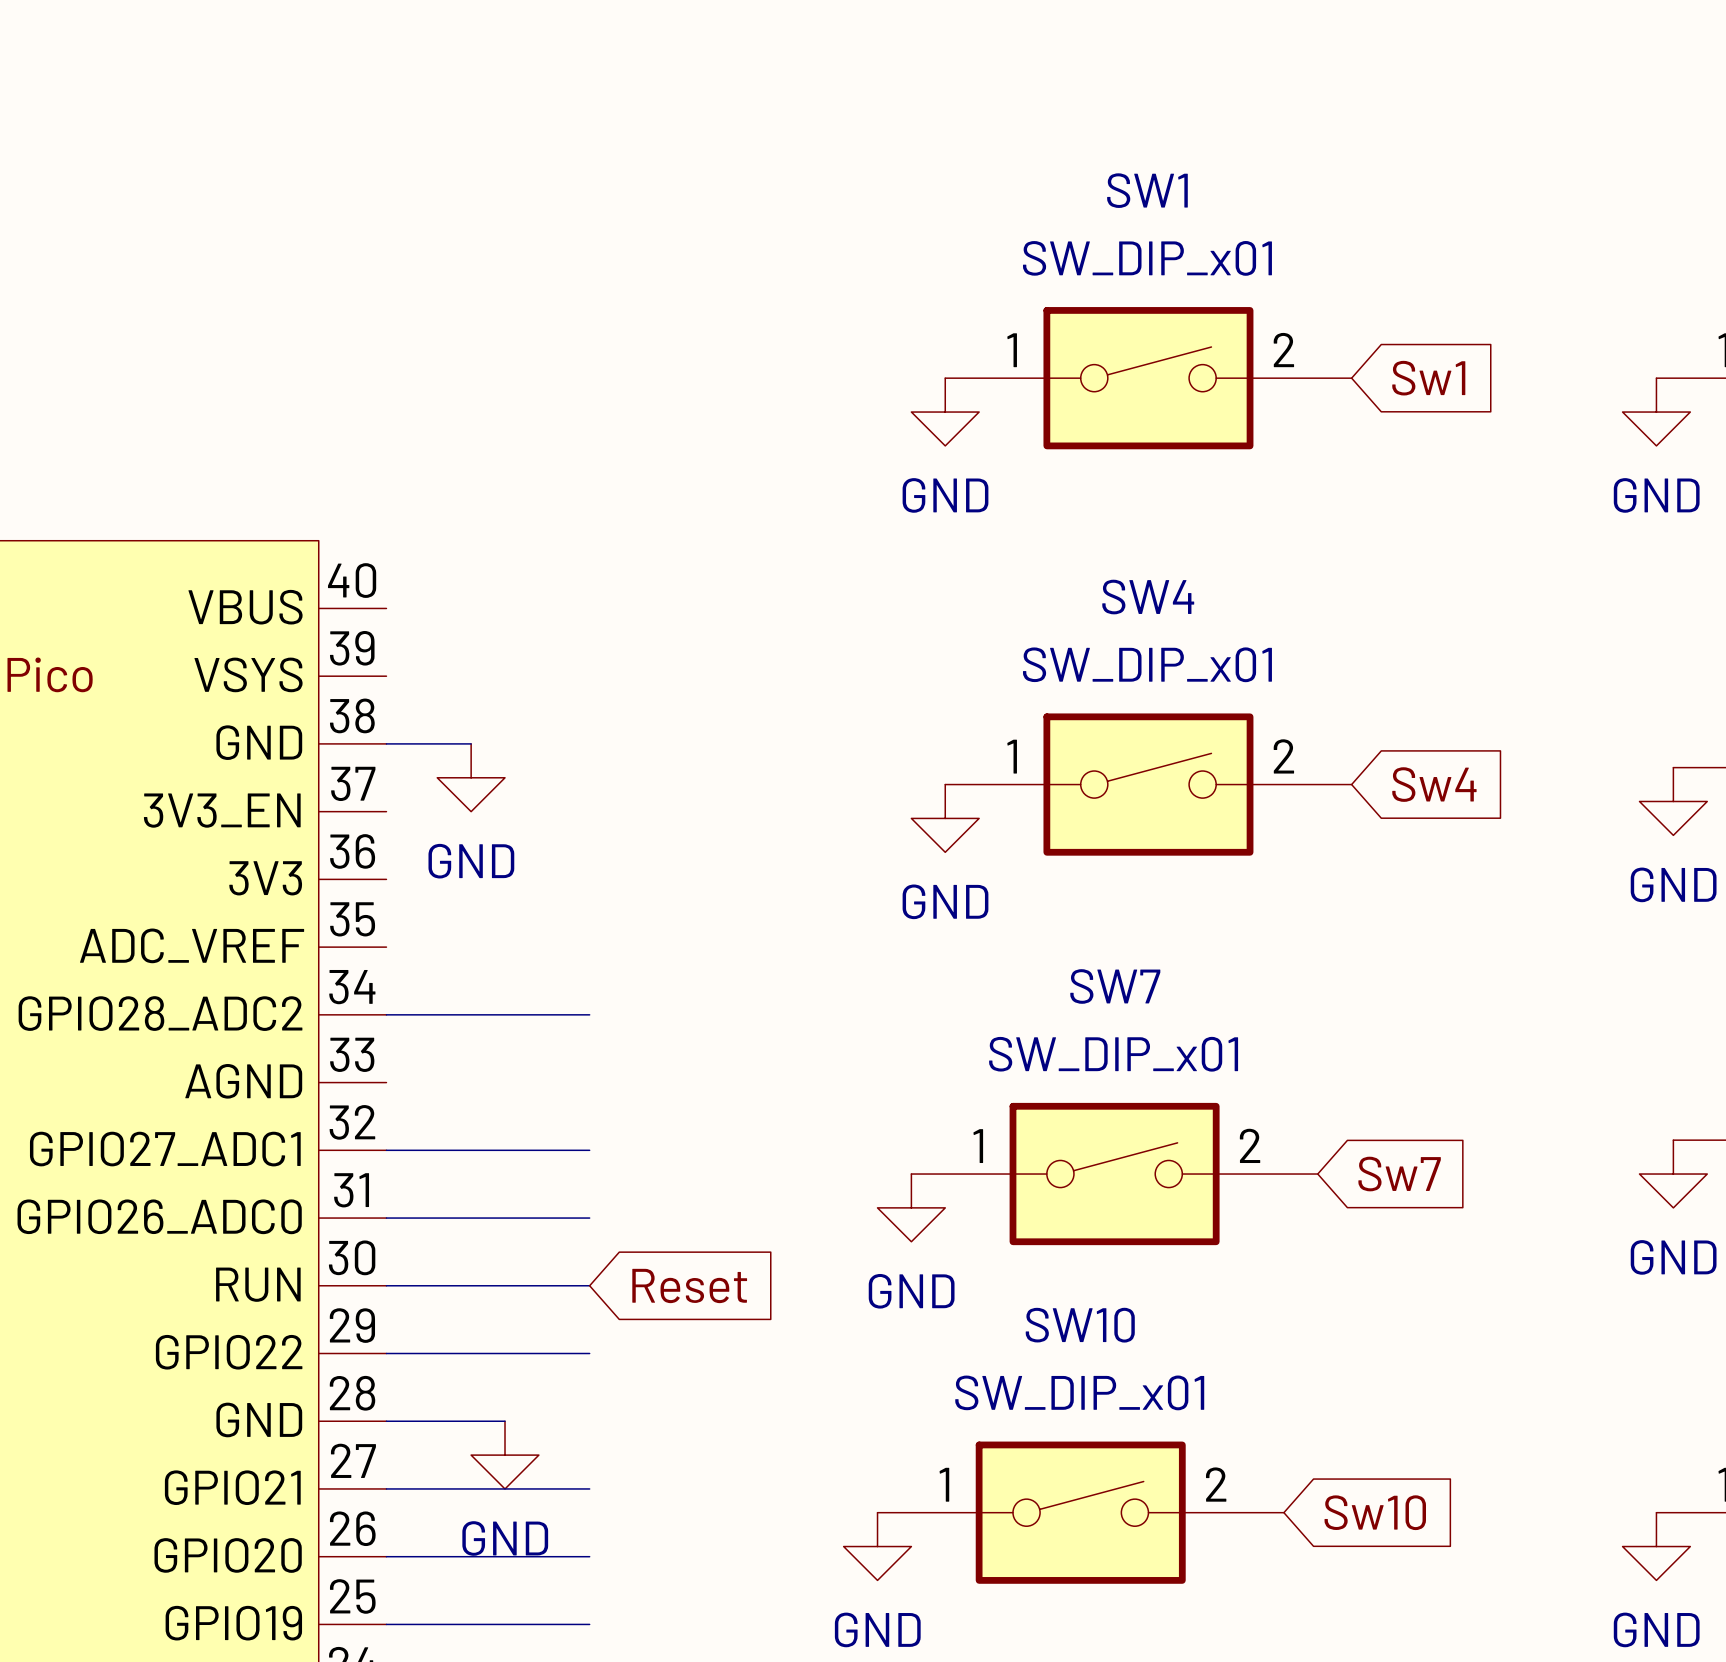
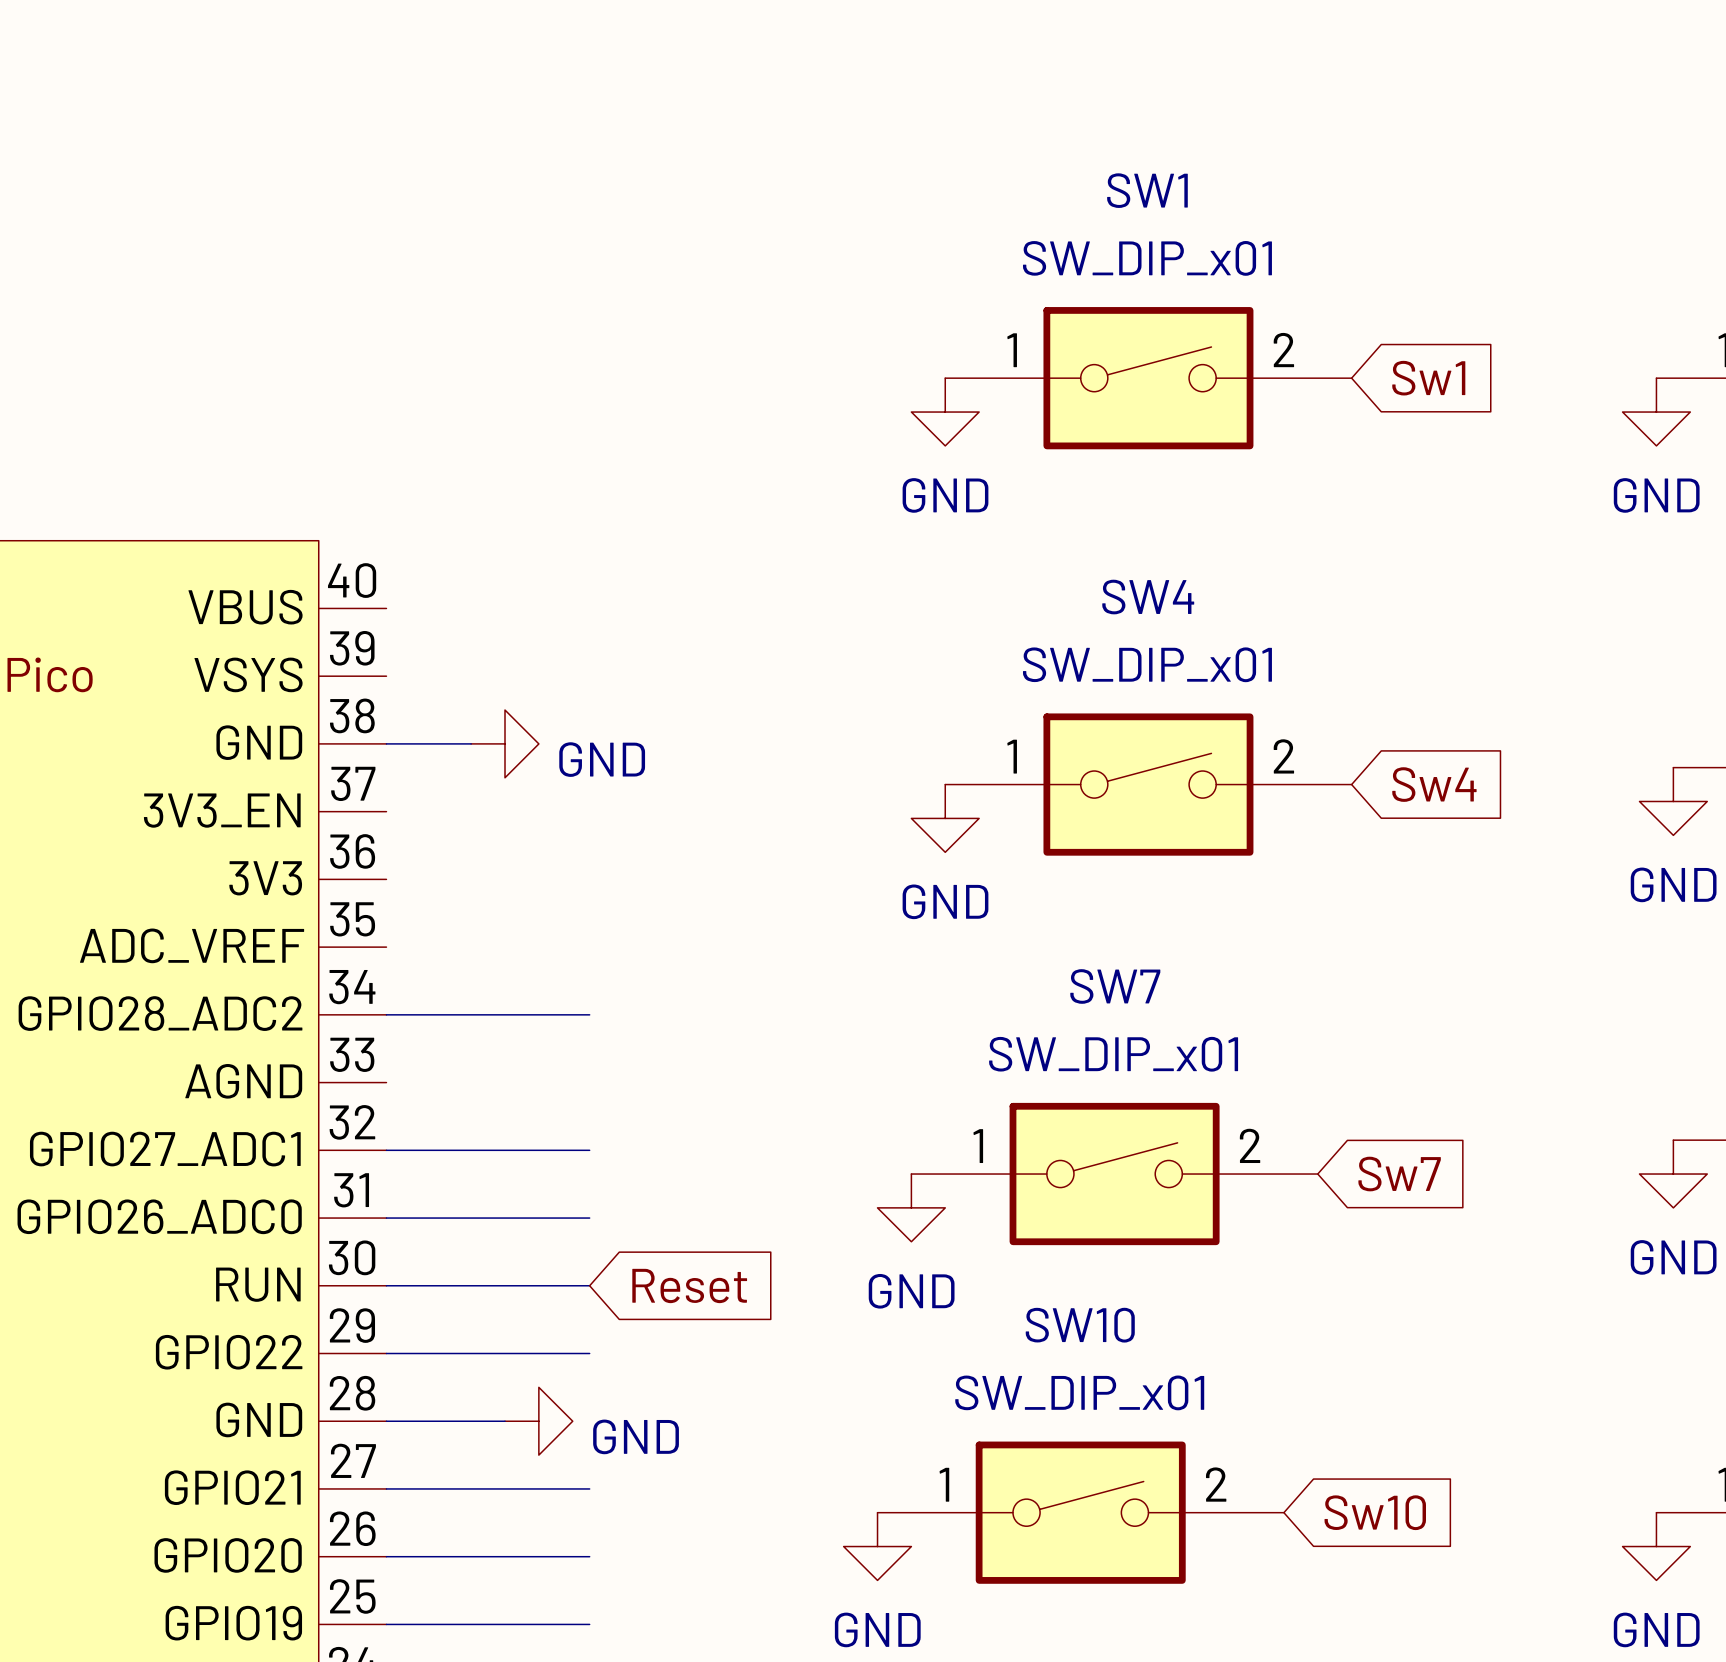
power symbol rotation: 0° (471, 777) -> 90° counterclockwise (505, 743)
power symbol position: GND (471, 777) -> GND (505, 743)
power symbol rotation: 0° (505, 1455) -> 90° counterclockwise (538, 1421)
power symbol position: GND (505, 1455) -> GND (538, 1421)

